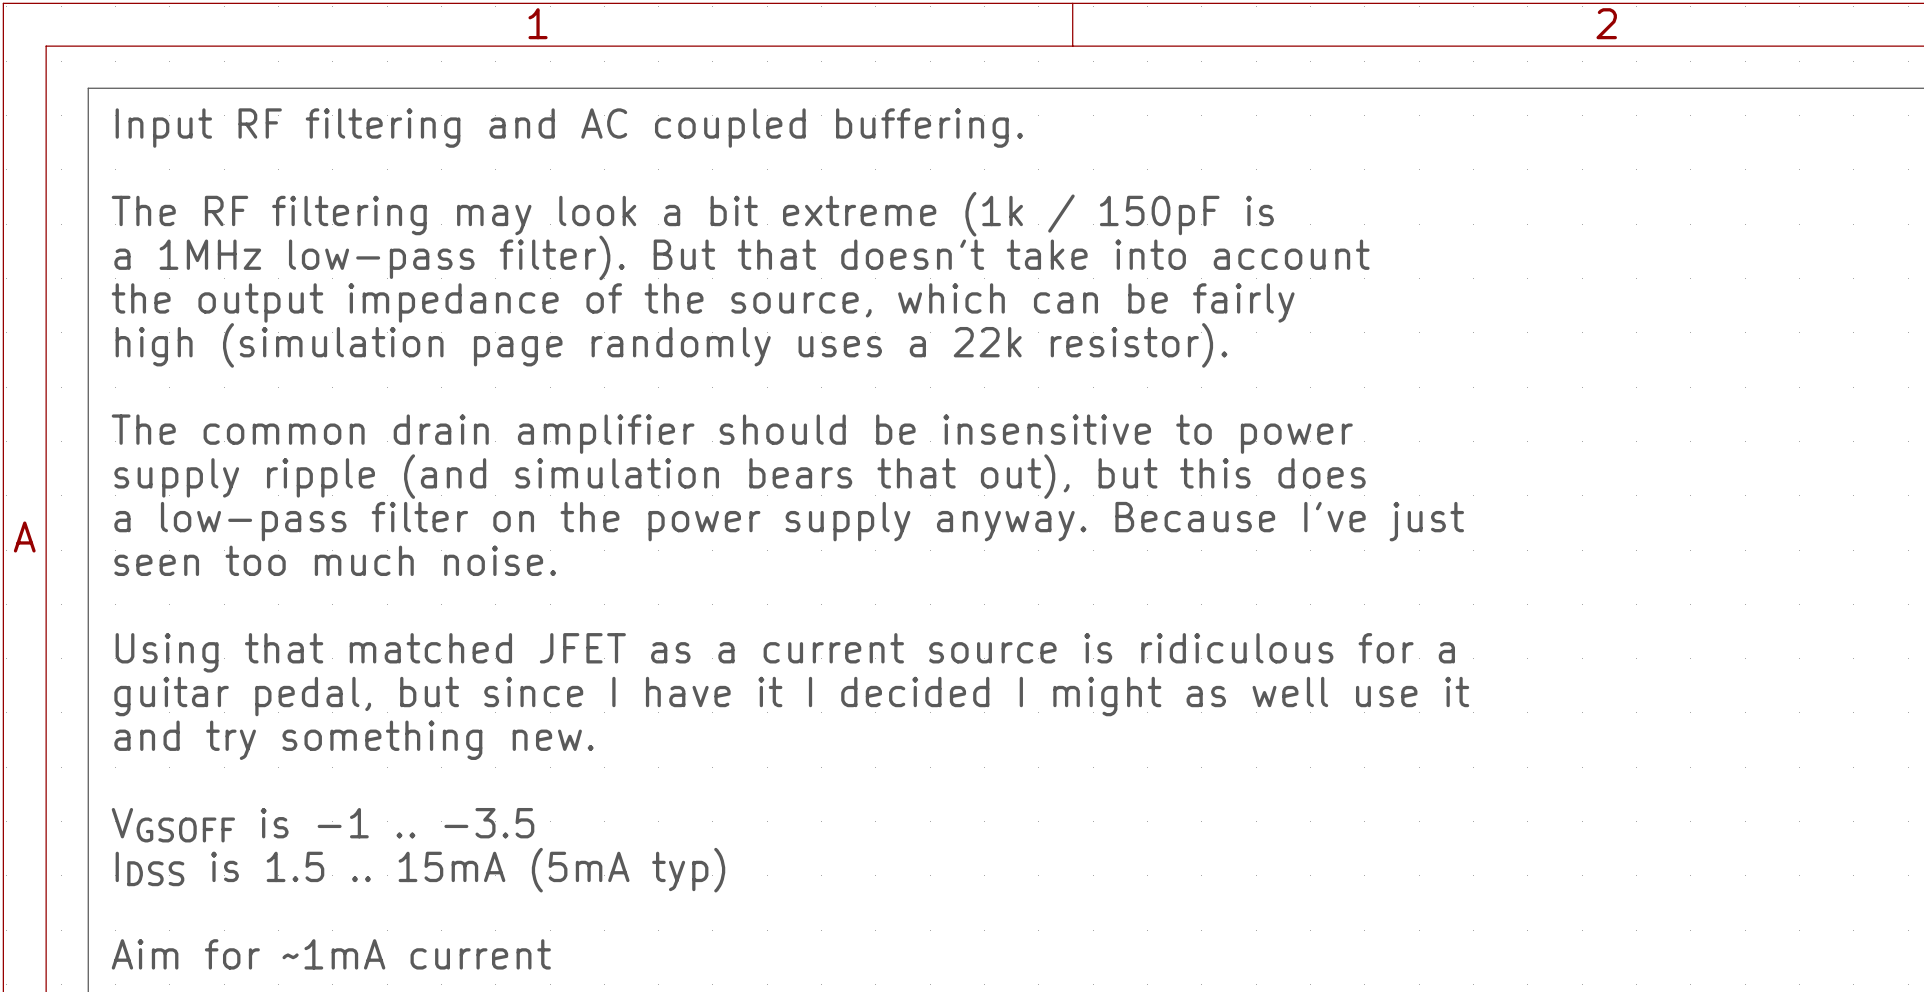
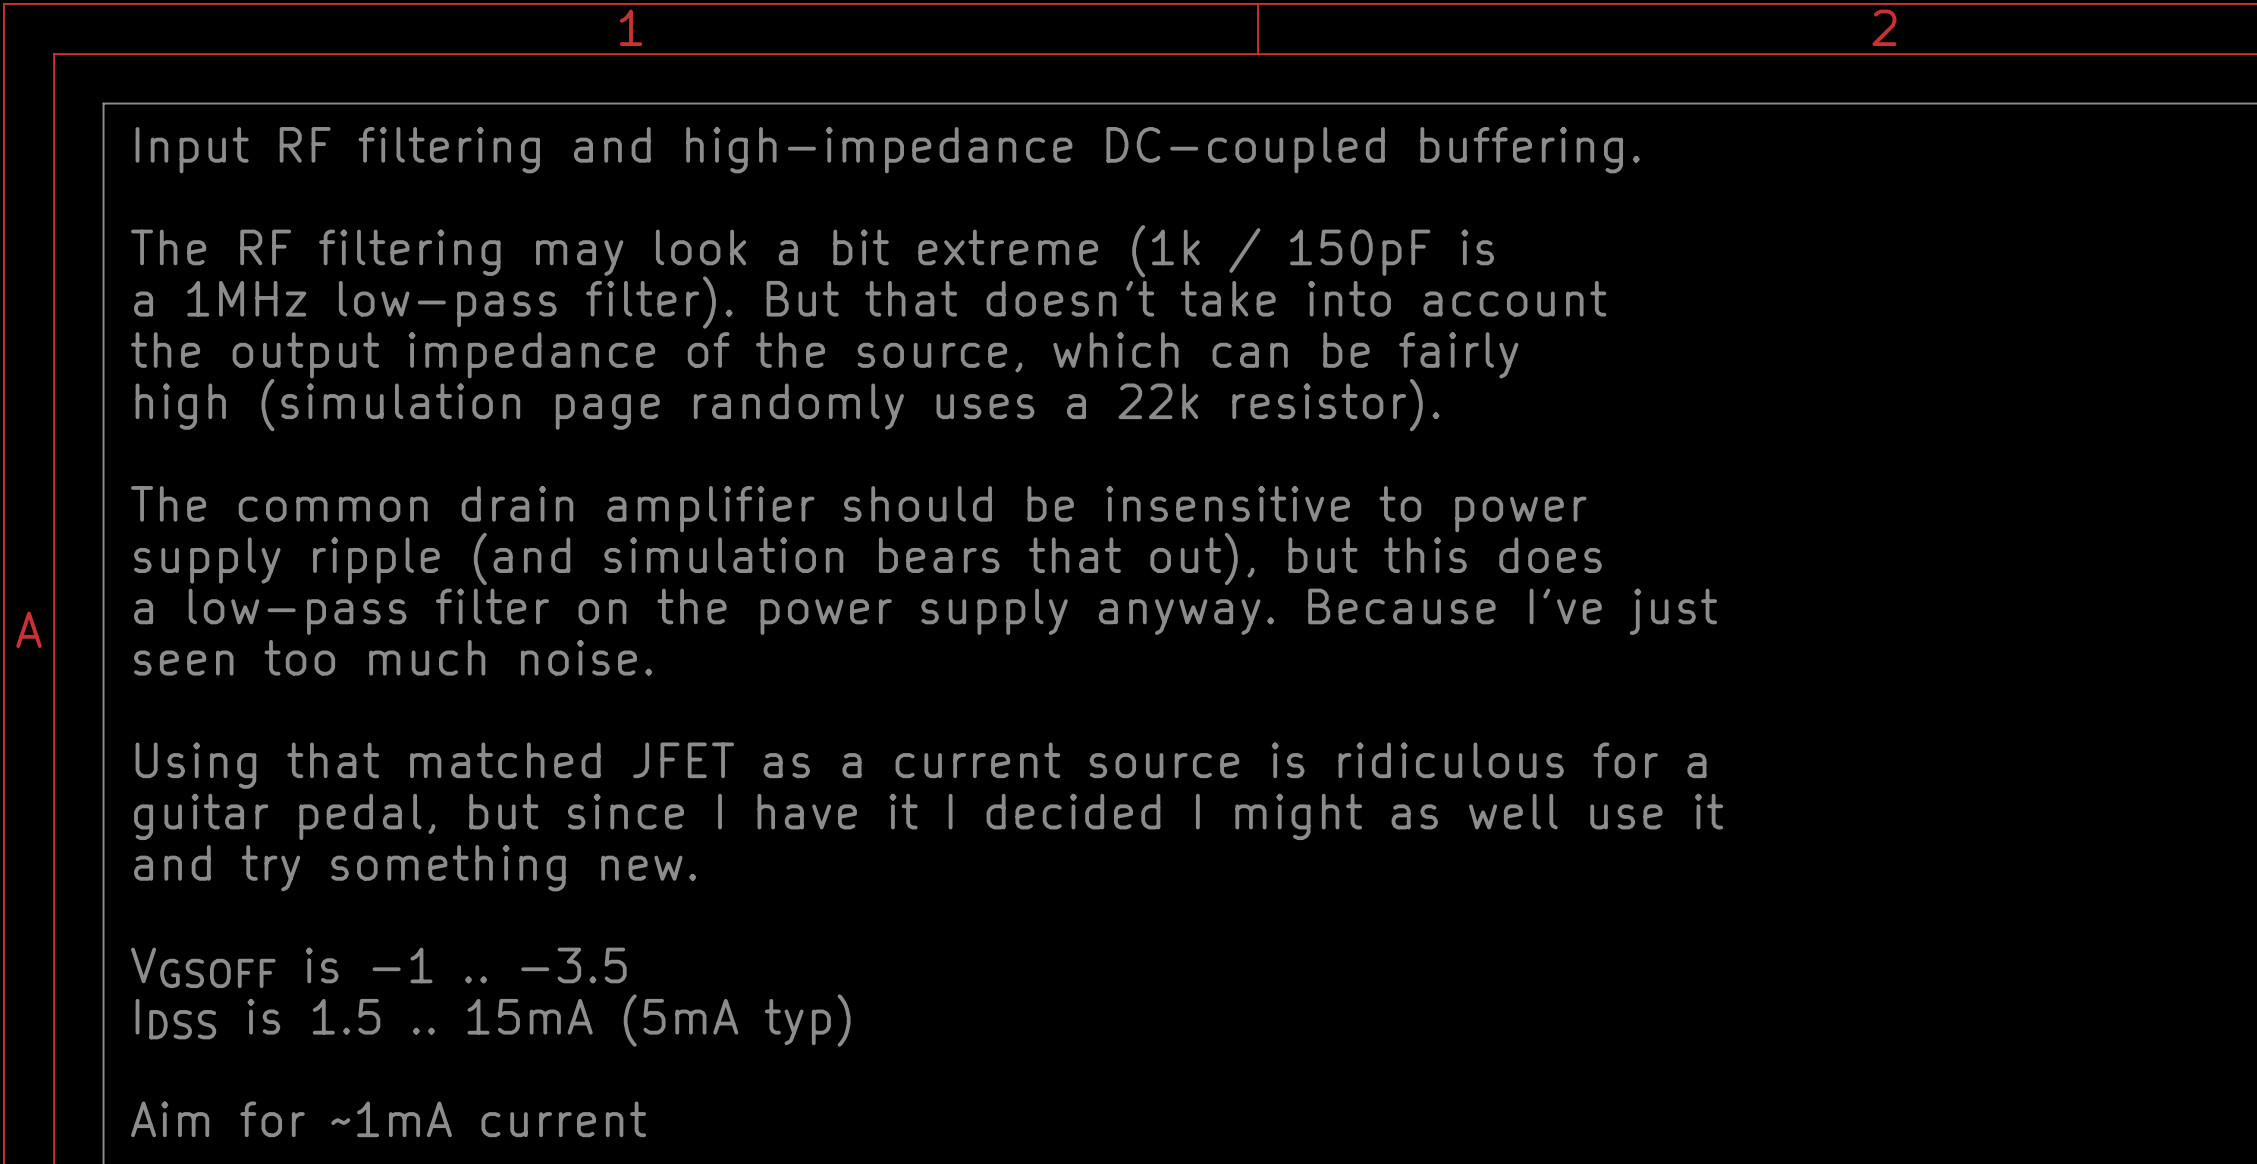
text: Input RF filtering and AC coupled buffering. (569, 128) -> Input RF filtering and high-impedance DC-coupled buffering. (887, 150)

